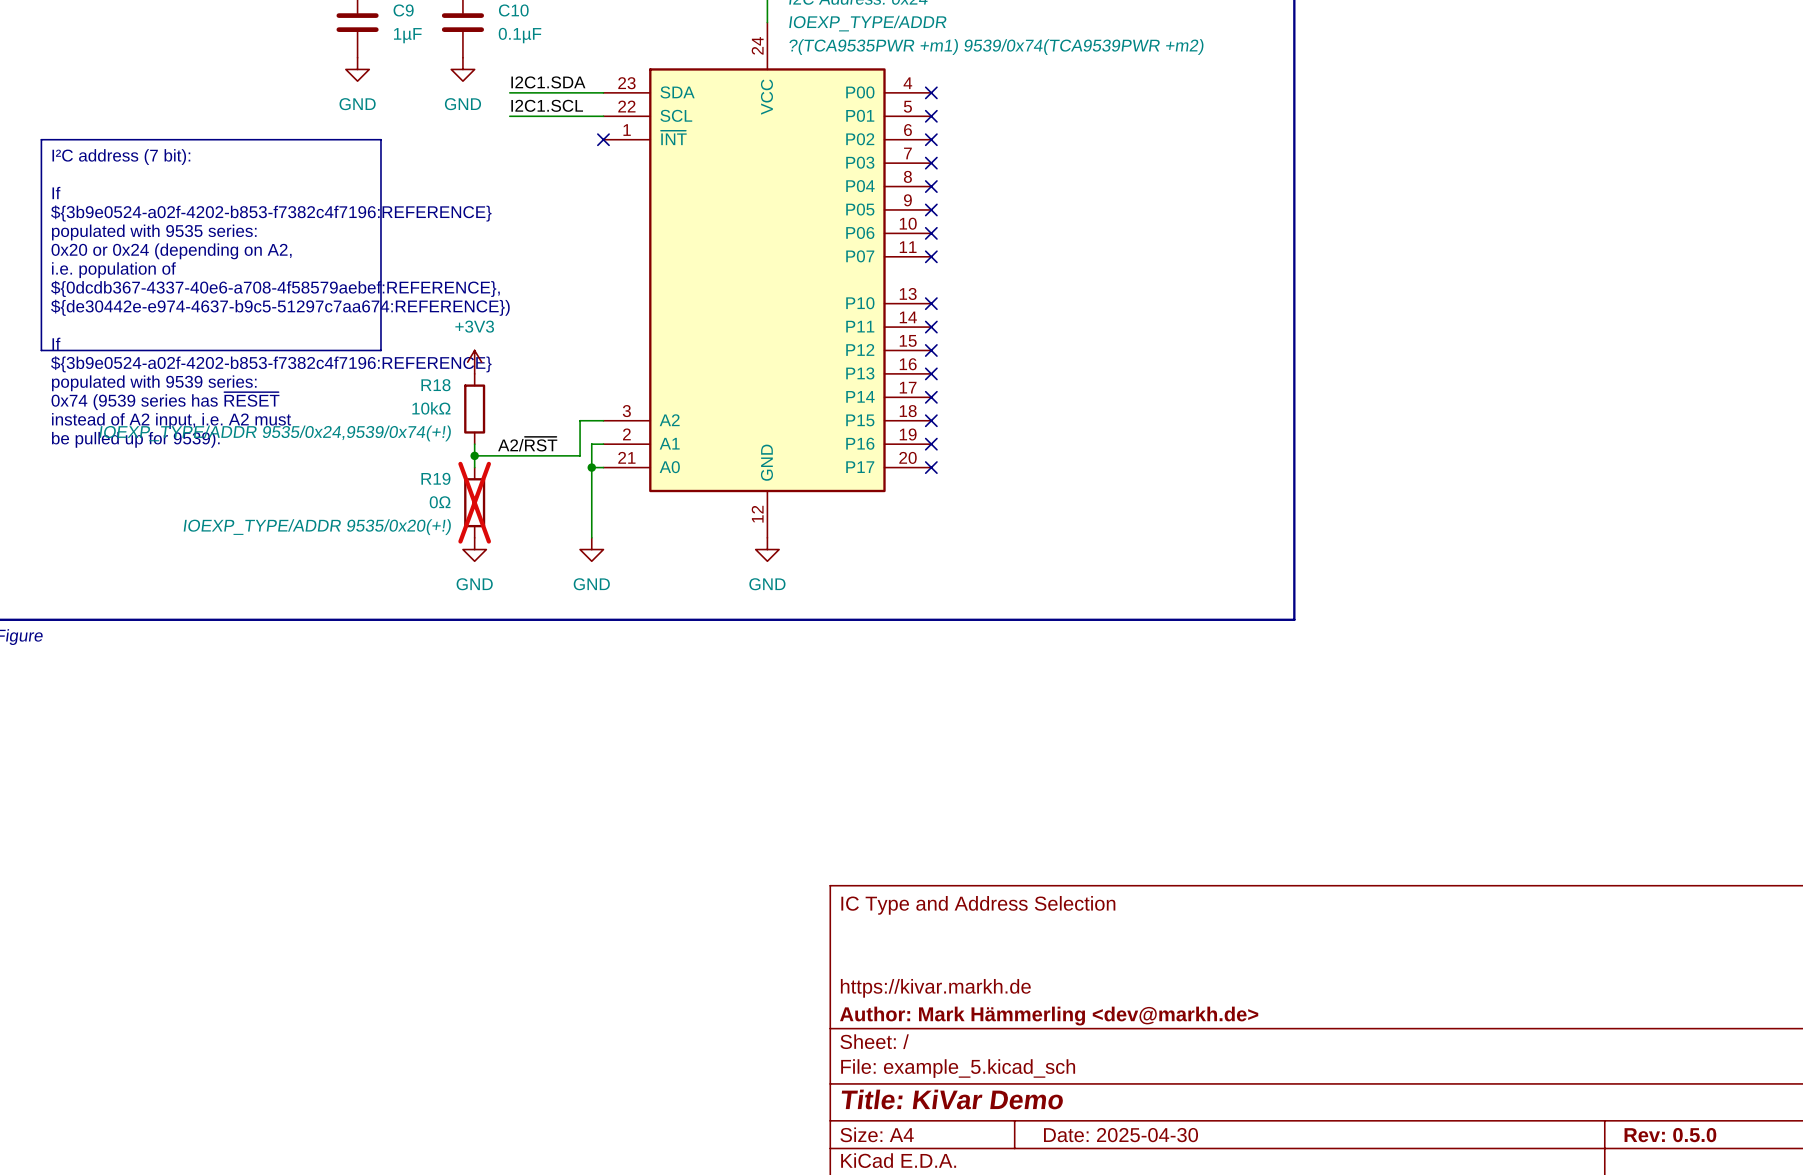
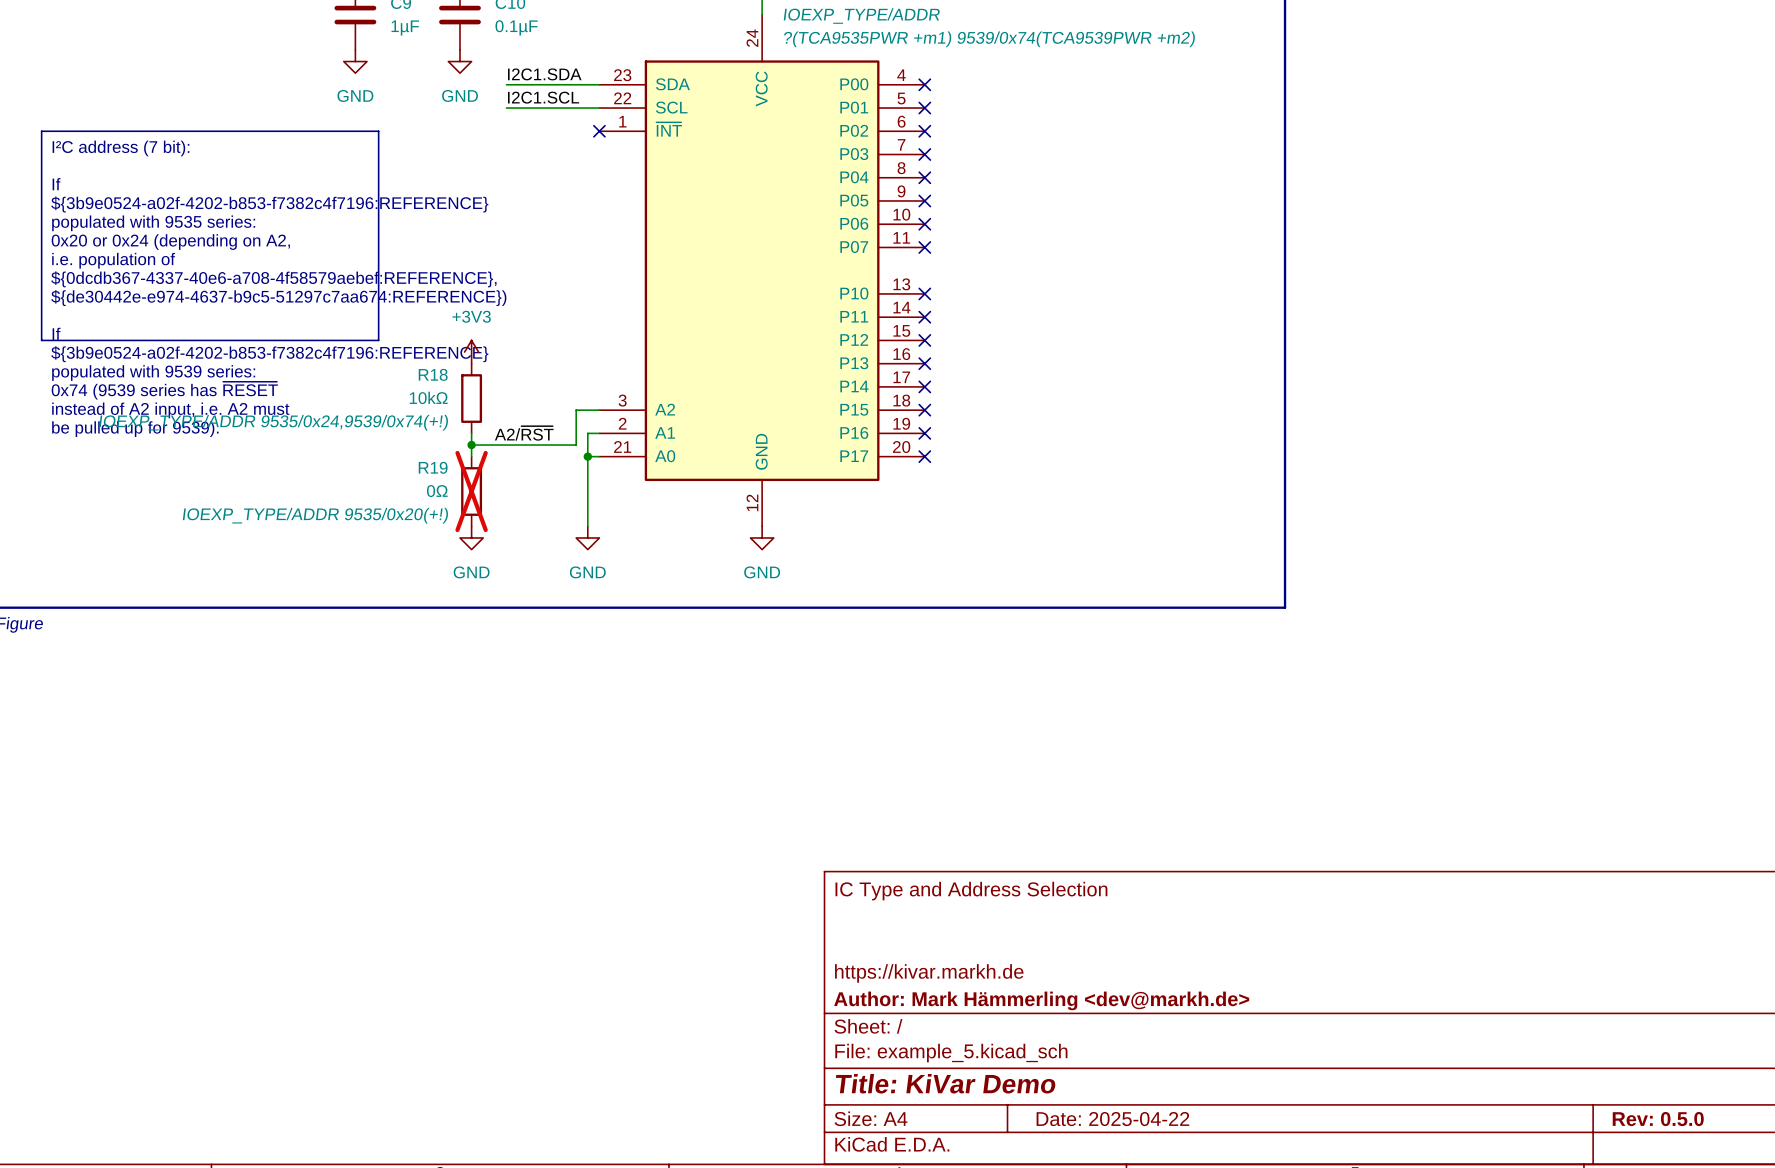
title block: Date: 2025-04-30 (1121, 1135) -> Date: 2025-04-22 (1112, 1119)

